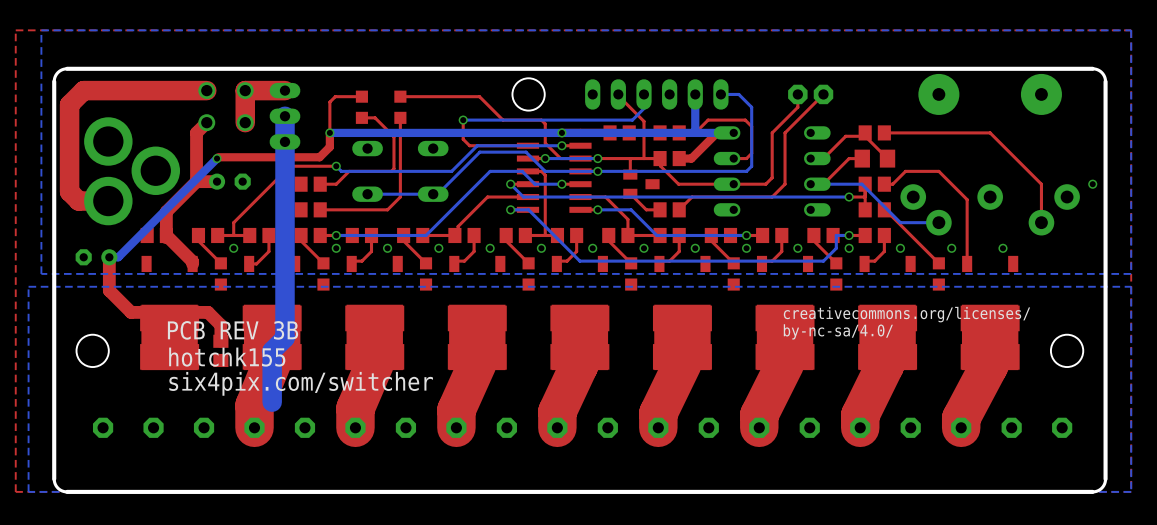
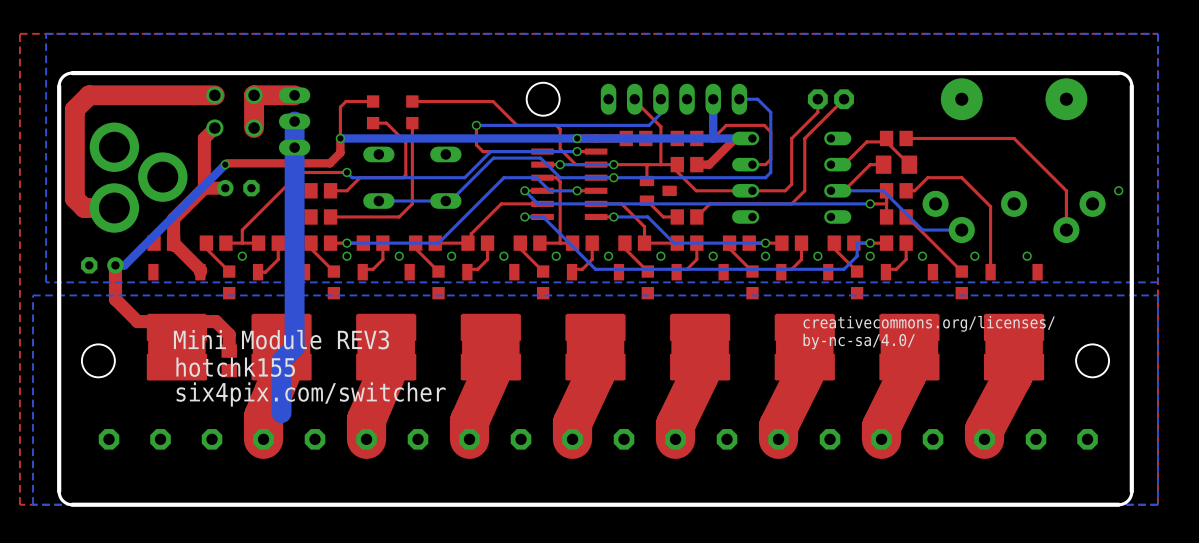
text: PCB REV 3B (233, 330) -> Mini Module REV3 (281, 339)

